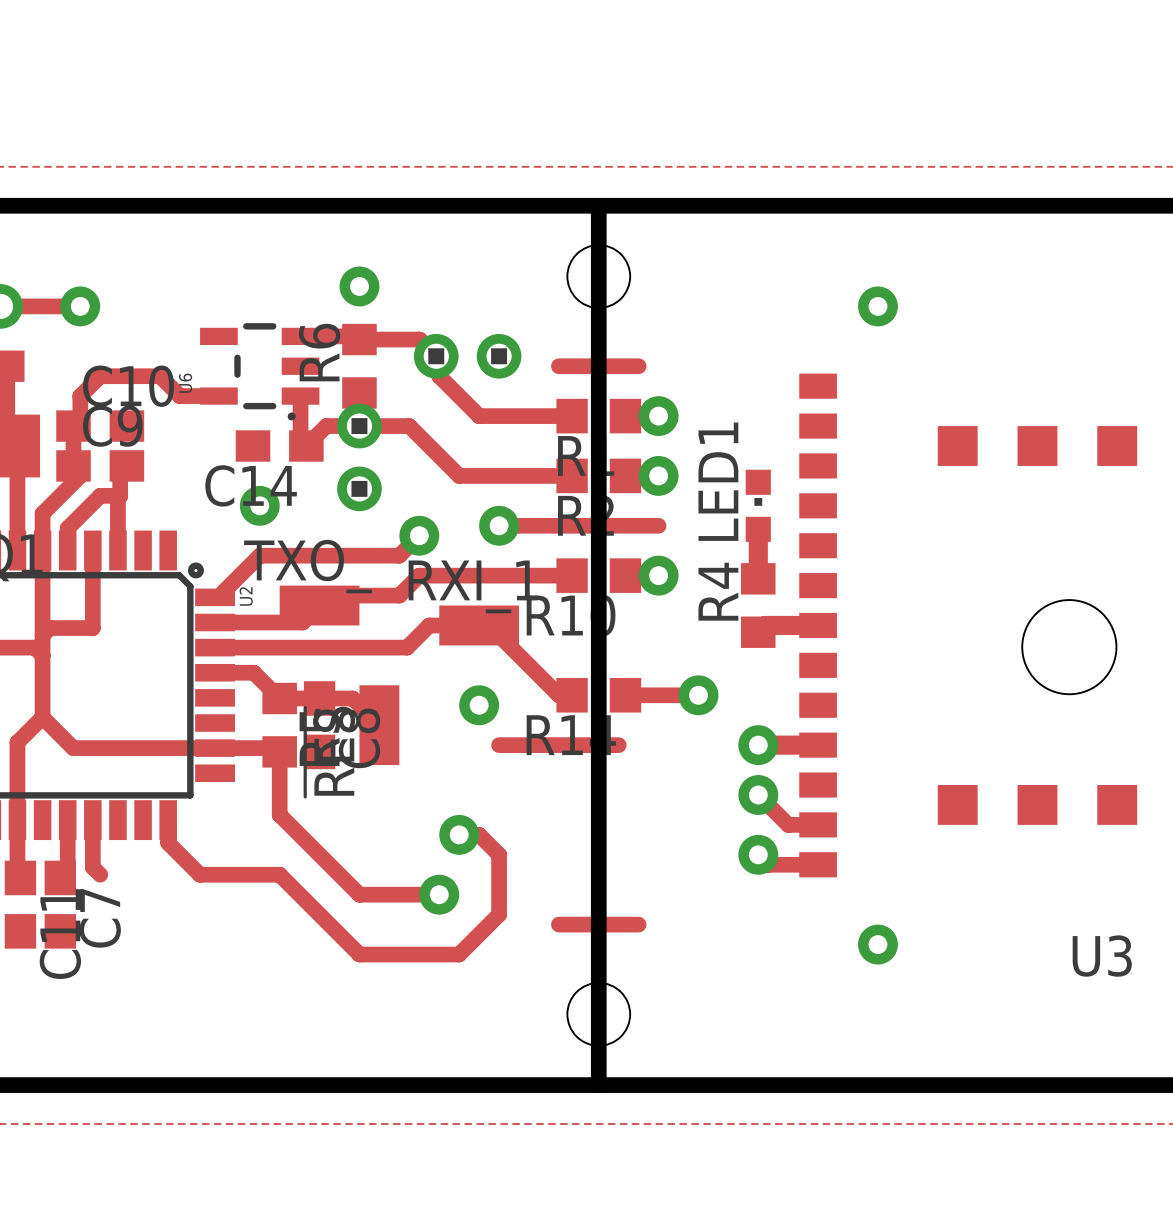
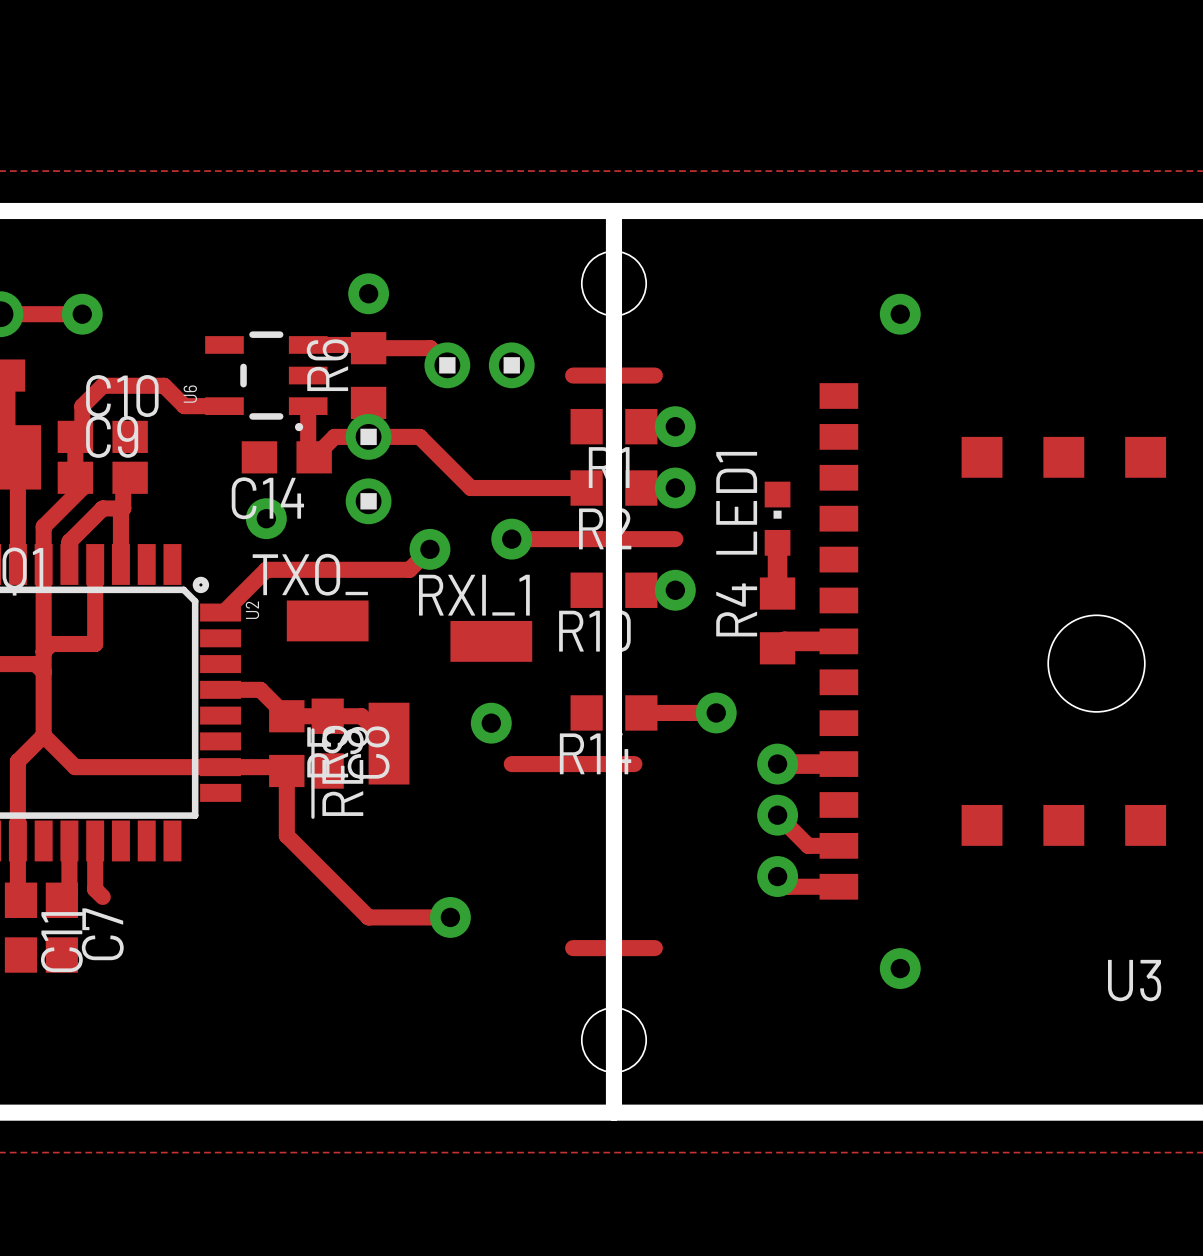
track: (436, 356) (439, 359) (439, 376) (479, 416) (572, 416) -> none
track: (572, 575) (419, 575) (399, 595) (329, 595) (302, 622) (215, 622) -> none
track: (215, 647) (407, 647) (429, 625) (479, 625) (489, 635) (499, 635) (558, 695) (572, 695) -> none
track: (168, 820) (168, 843) (199, 874) (279, 874) (359, 954) (459, 954) (499, 914) (499, 854) (479, 834) (459, 834) -> none
via: (459, 834) -> none

